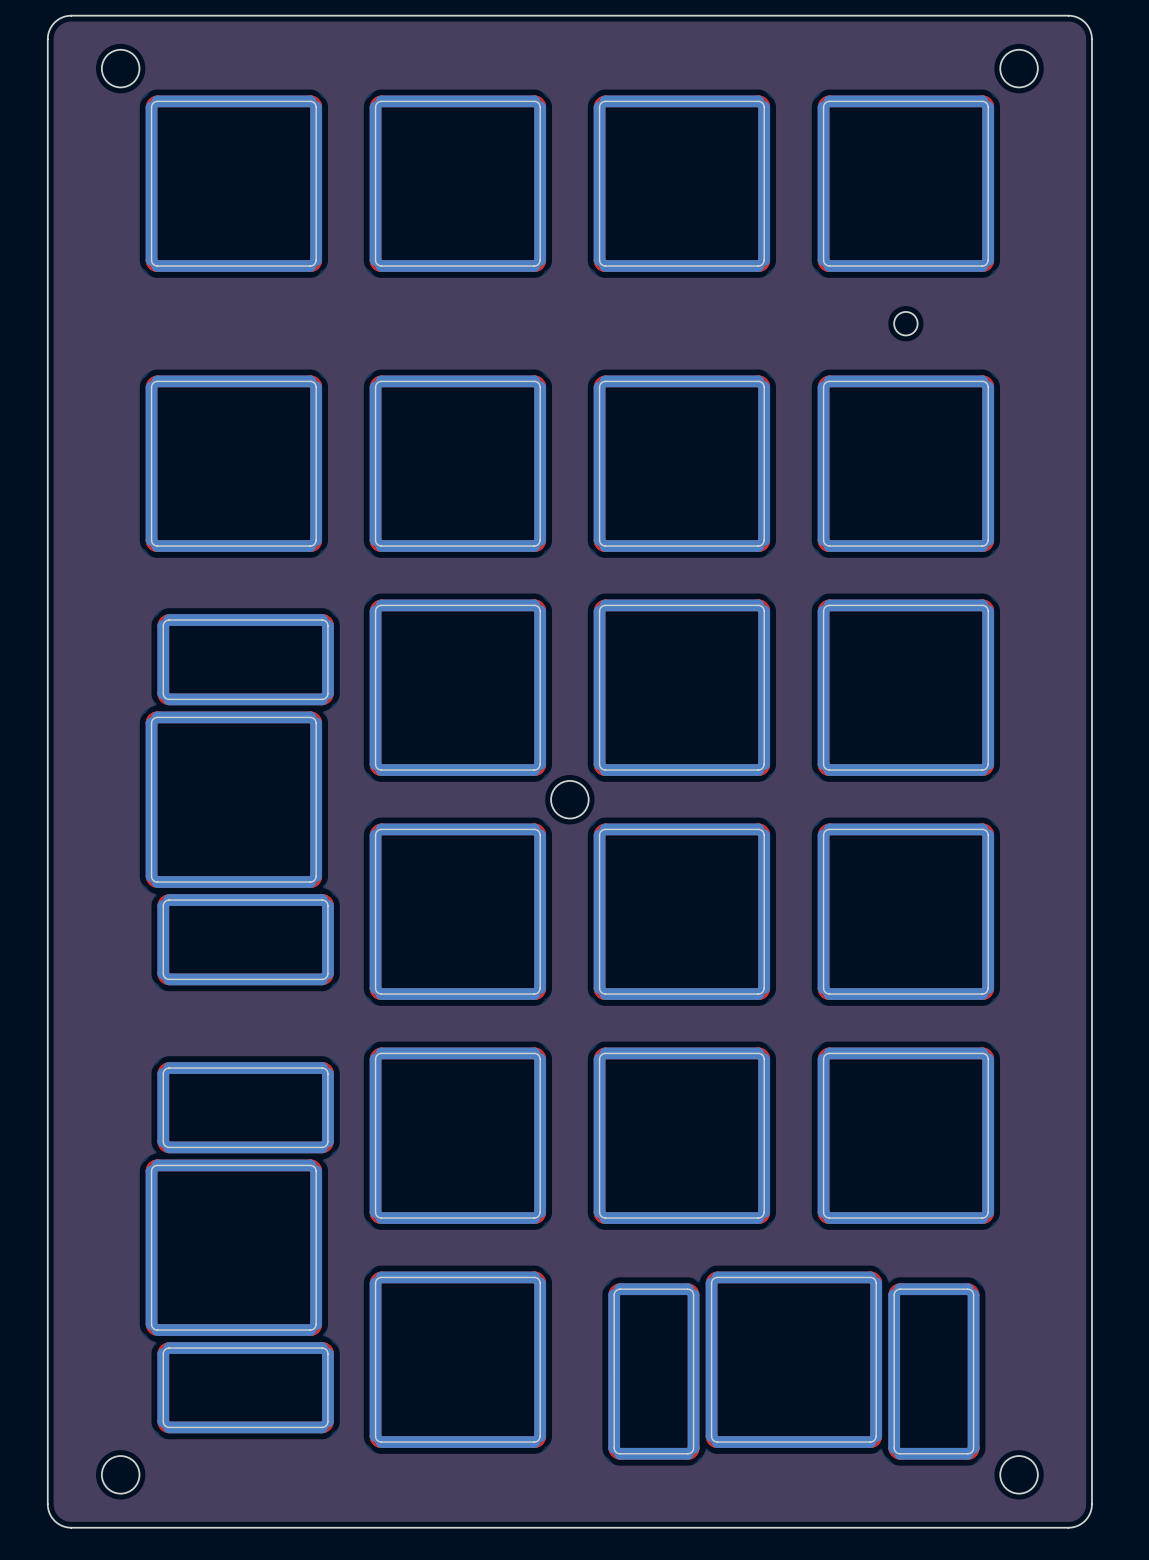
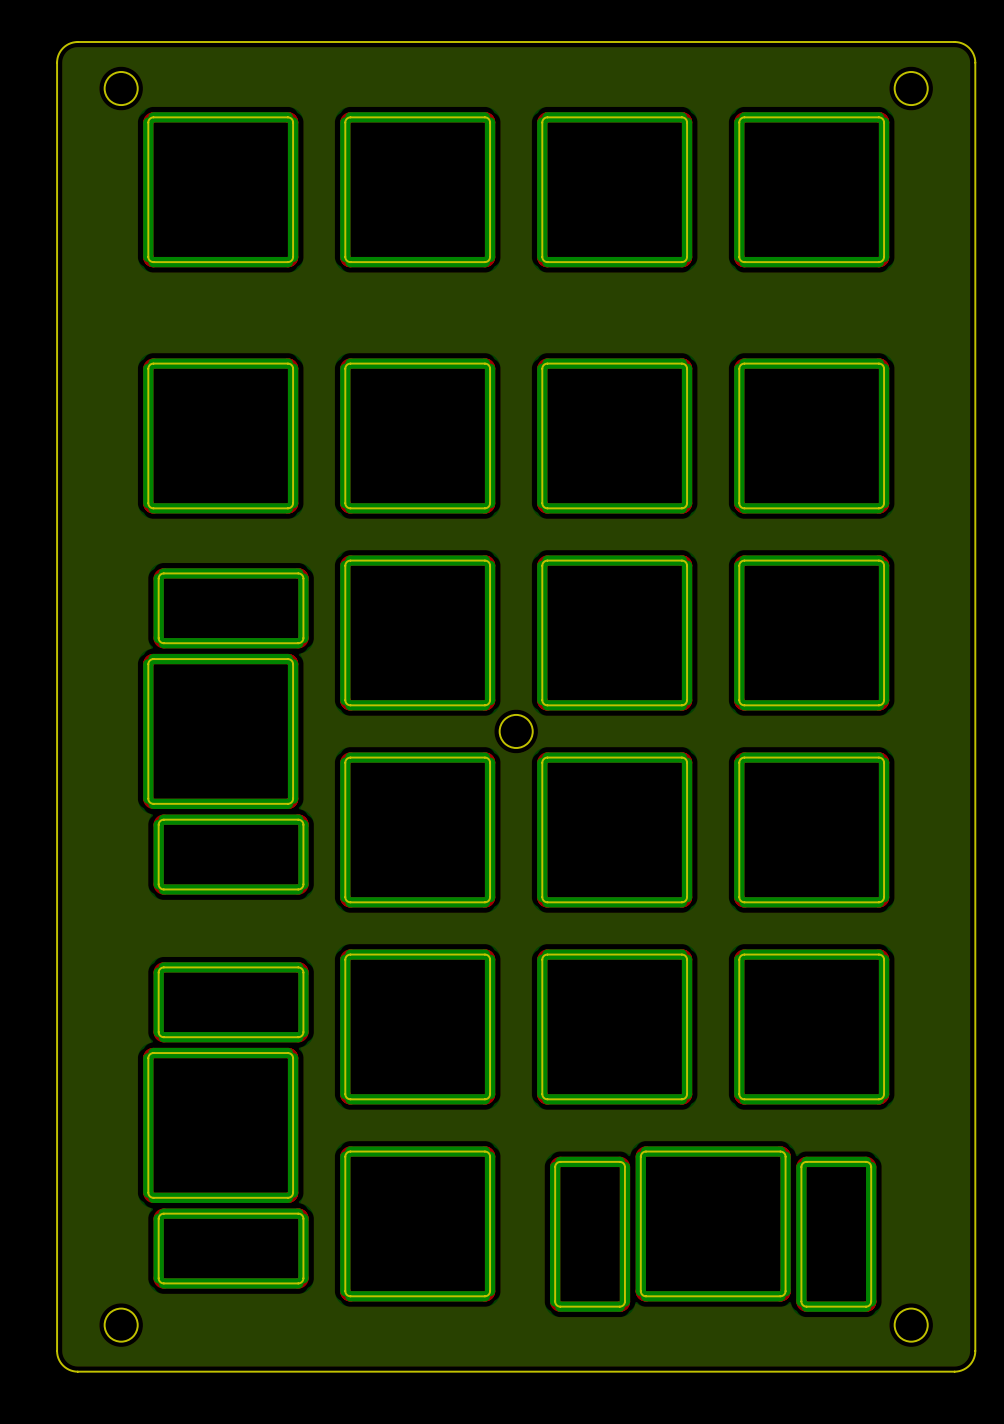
round board edge: [893, 311, 919, 337] -> none

